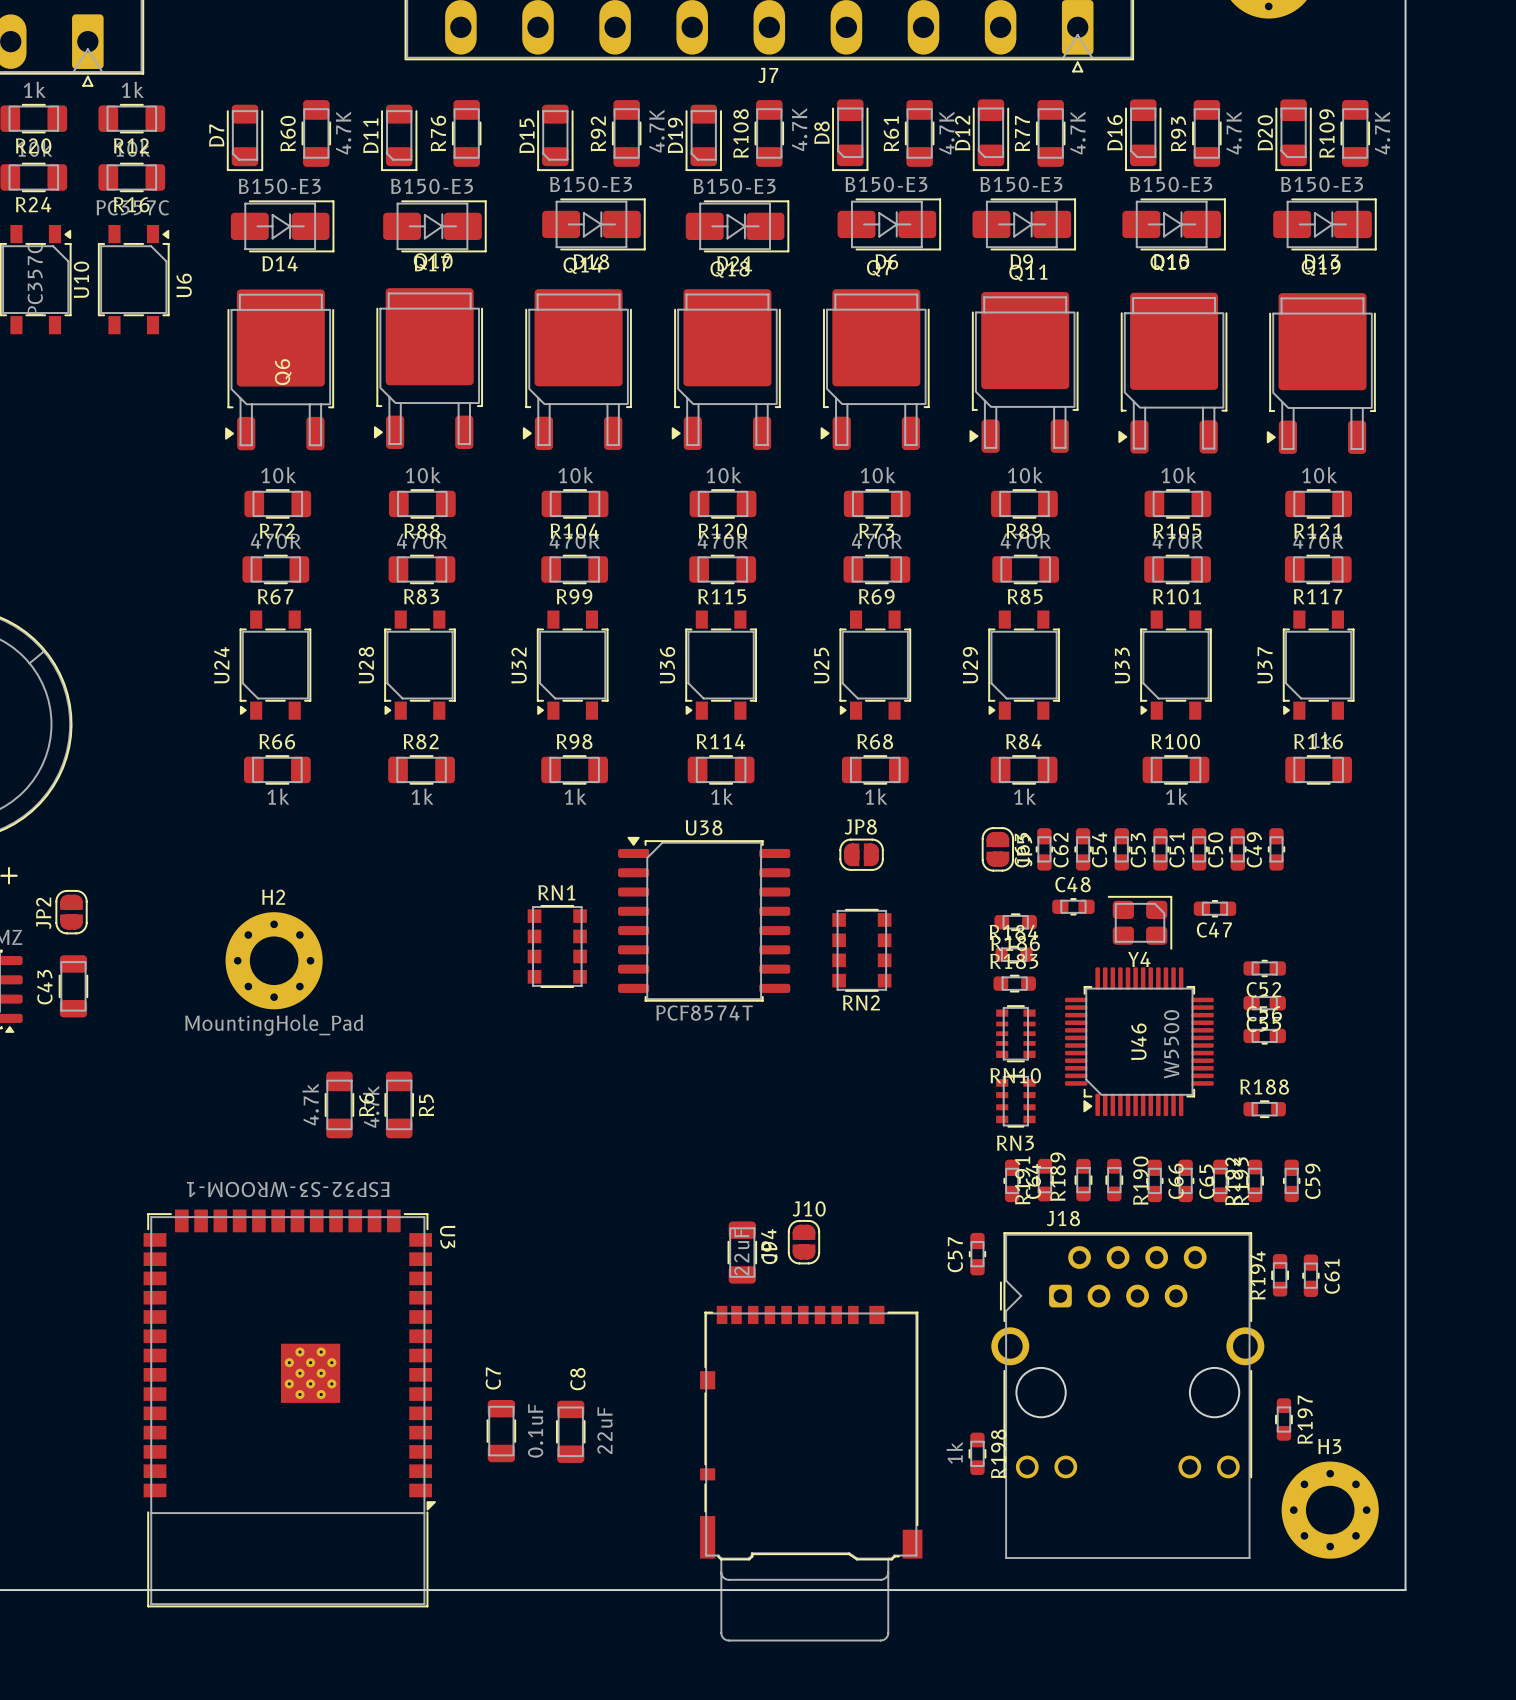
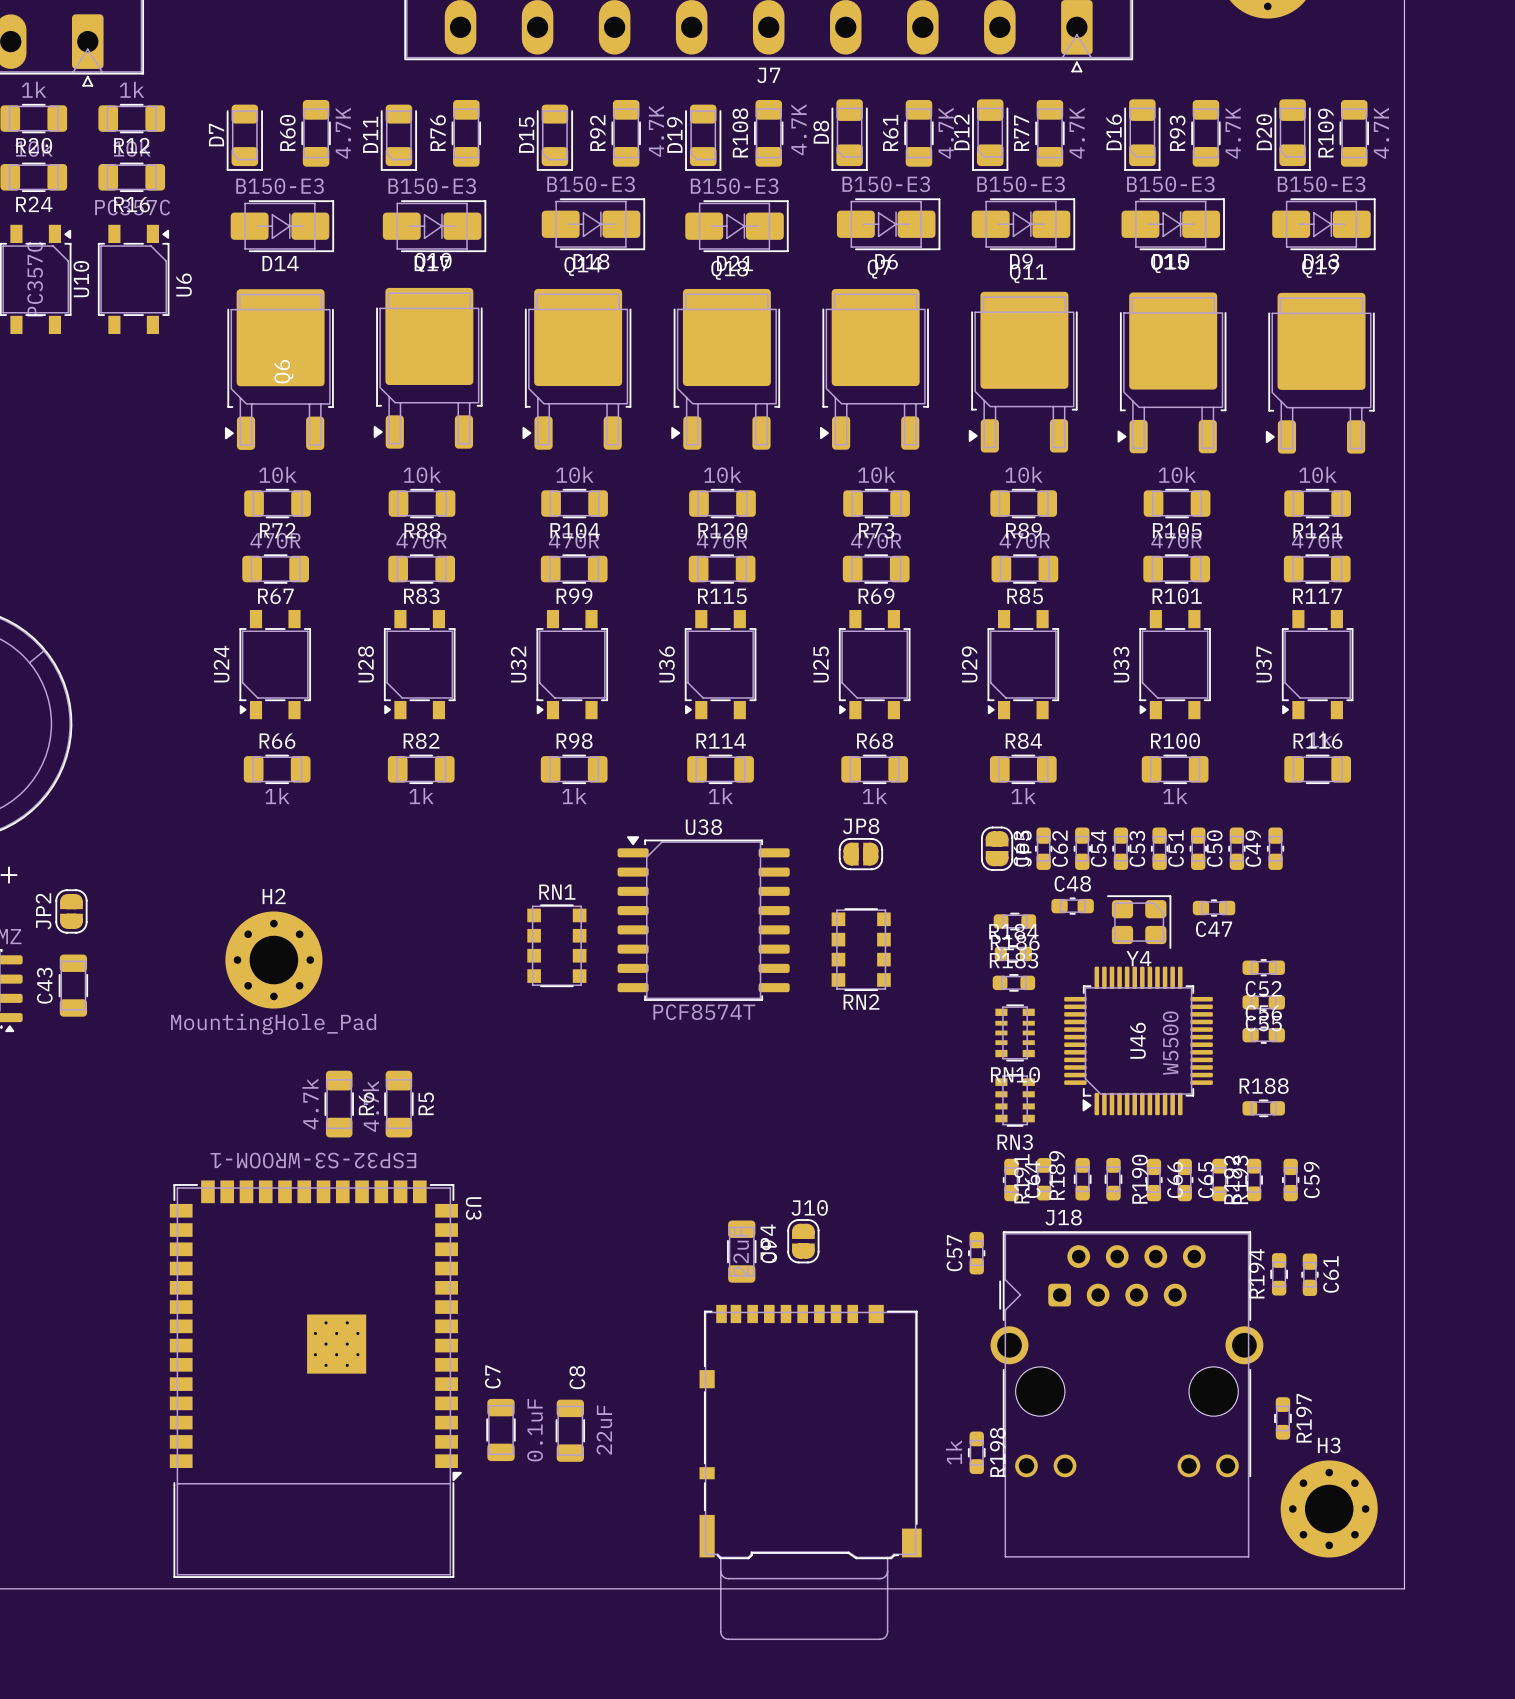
U3 position: (289, 1408) -> (315, 1379)

